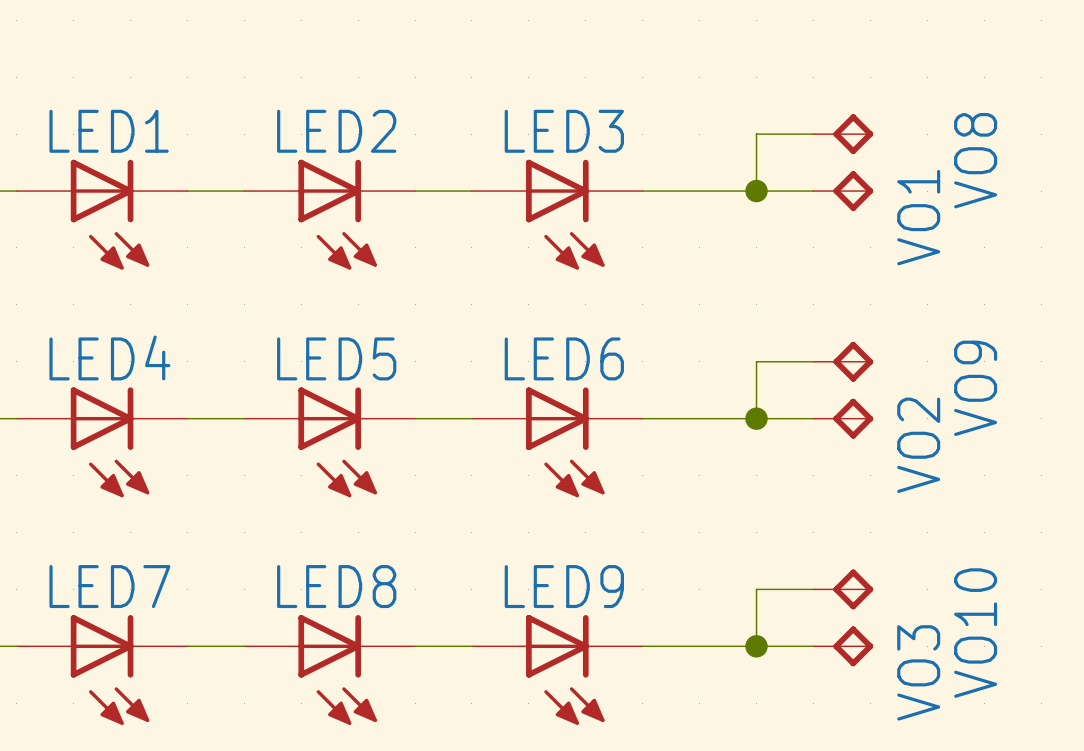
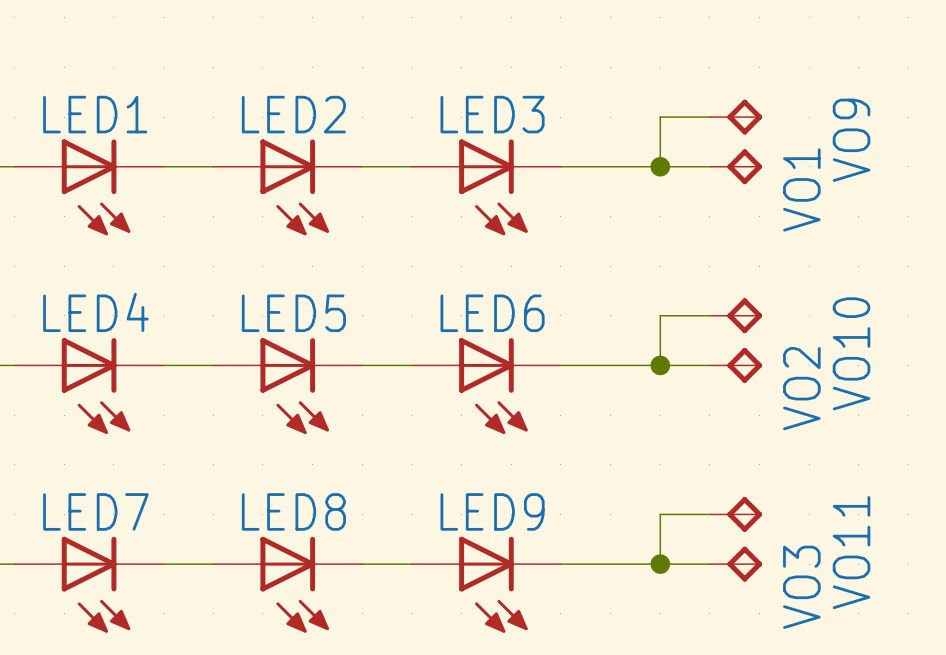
VO8 name: VO8 (975, 160) -> VO9 (851, 140)
VO9 name: VO9 (975, 388) -> VO10 (851, 353)
VO10 name: VO10 (975, 633) -> VO11 (851, 552)

